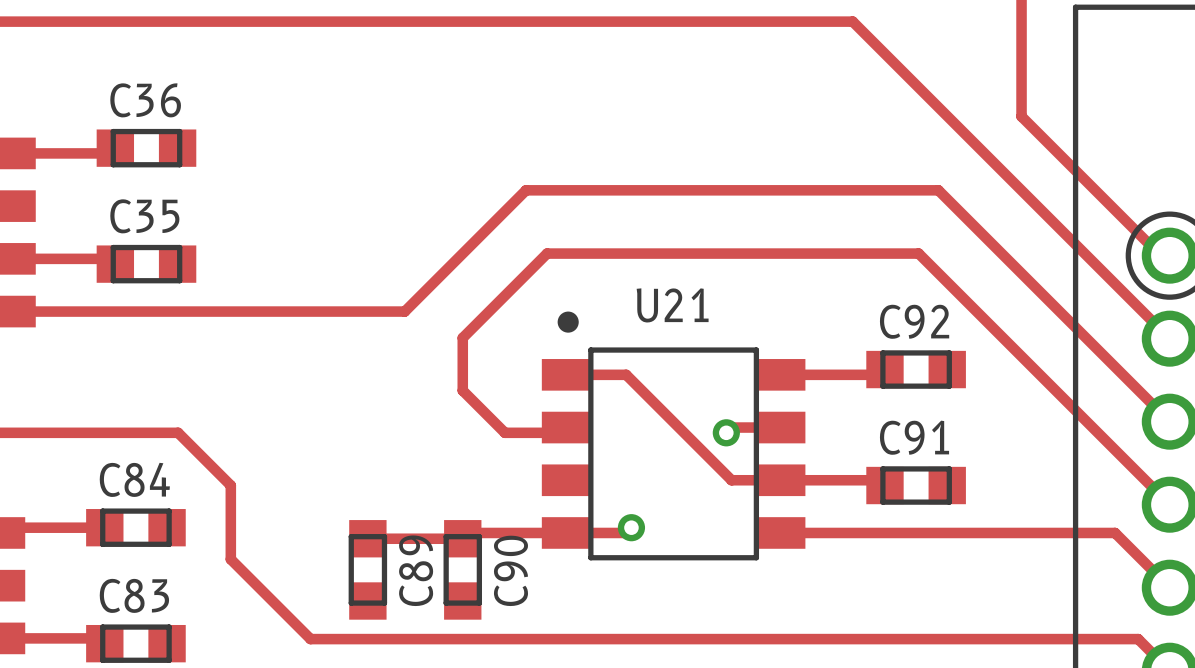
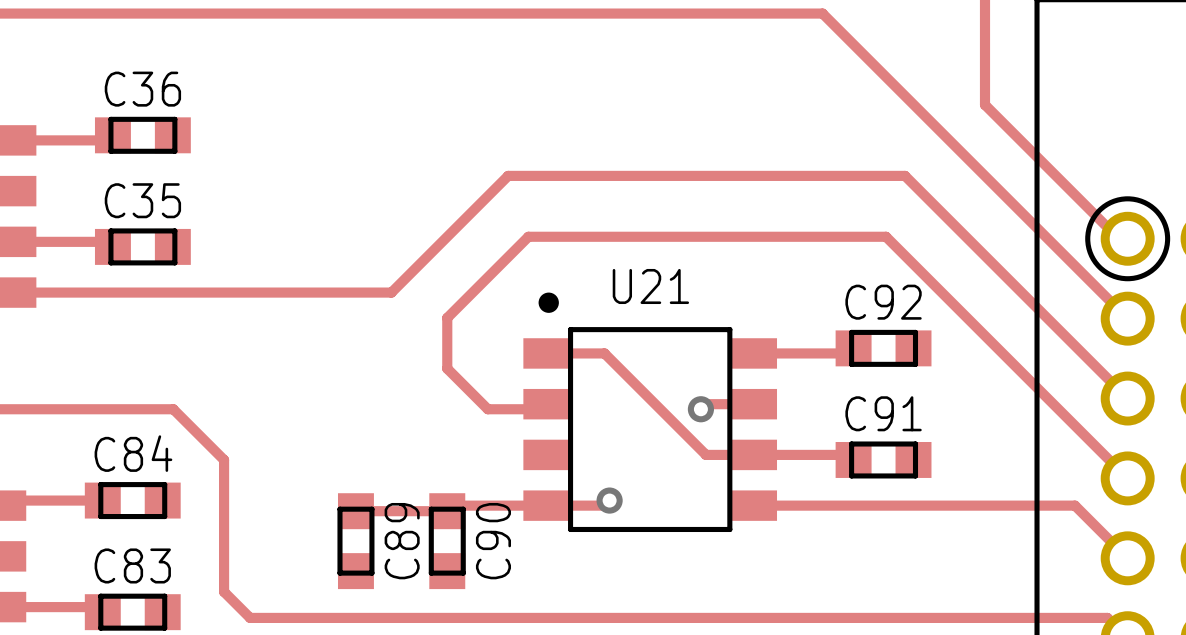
track: (230, 559) (310, 639) (1138, 639) (1148, 649) -> (224, 531) (224, 591) (250, 617) (1107, 617)

